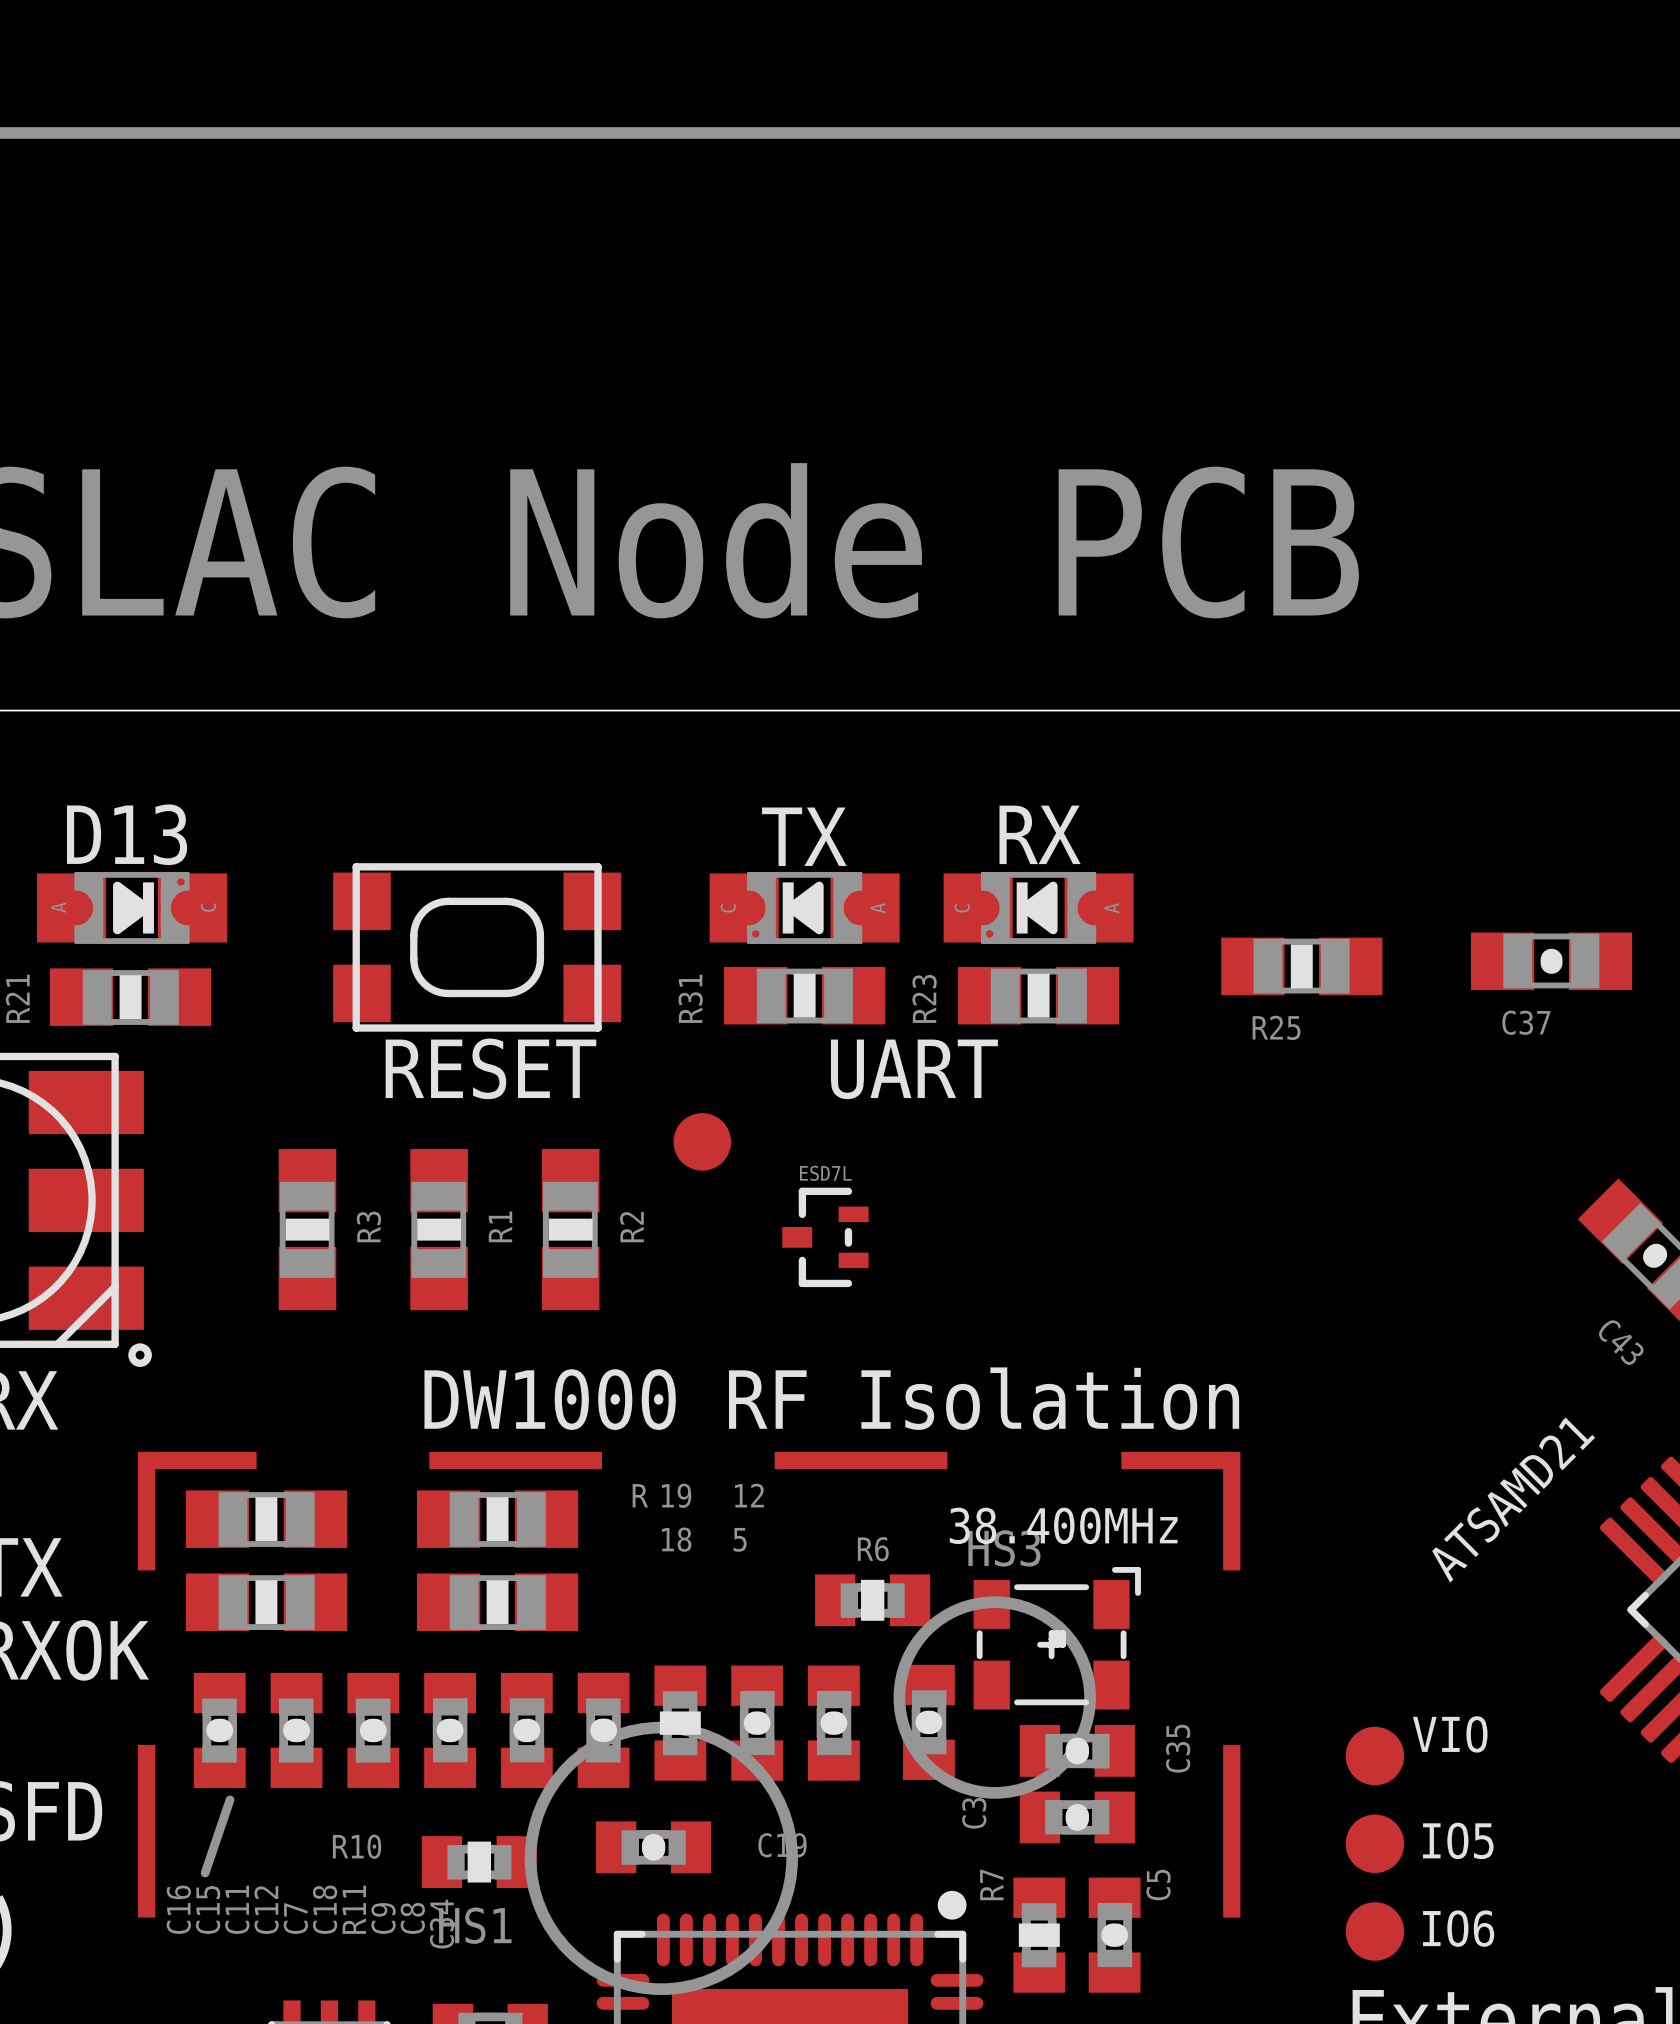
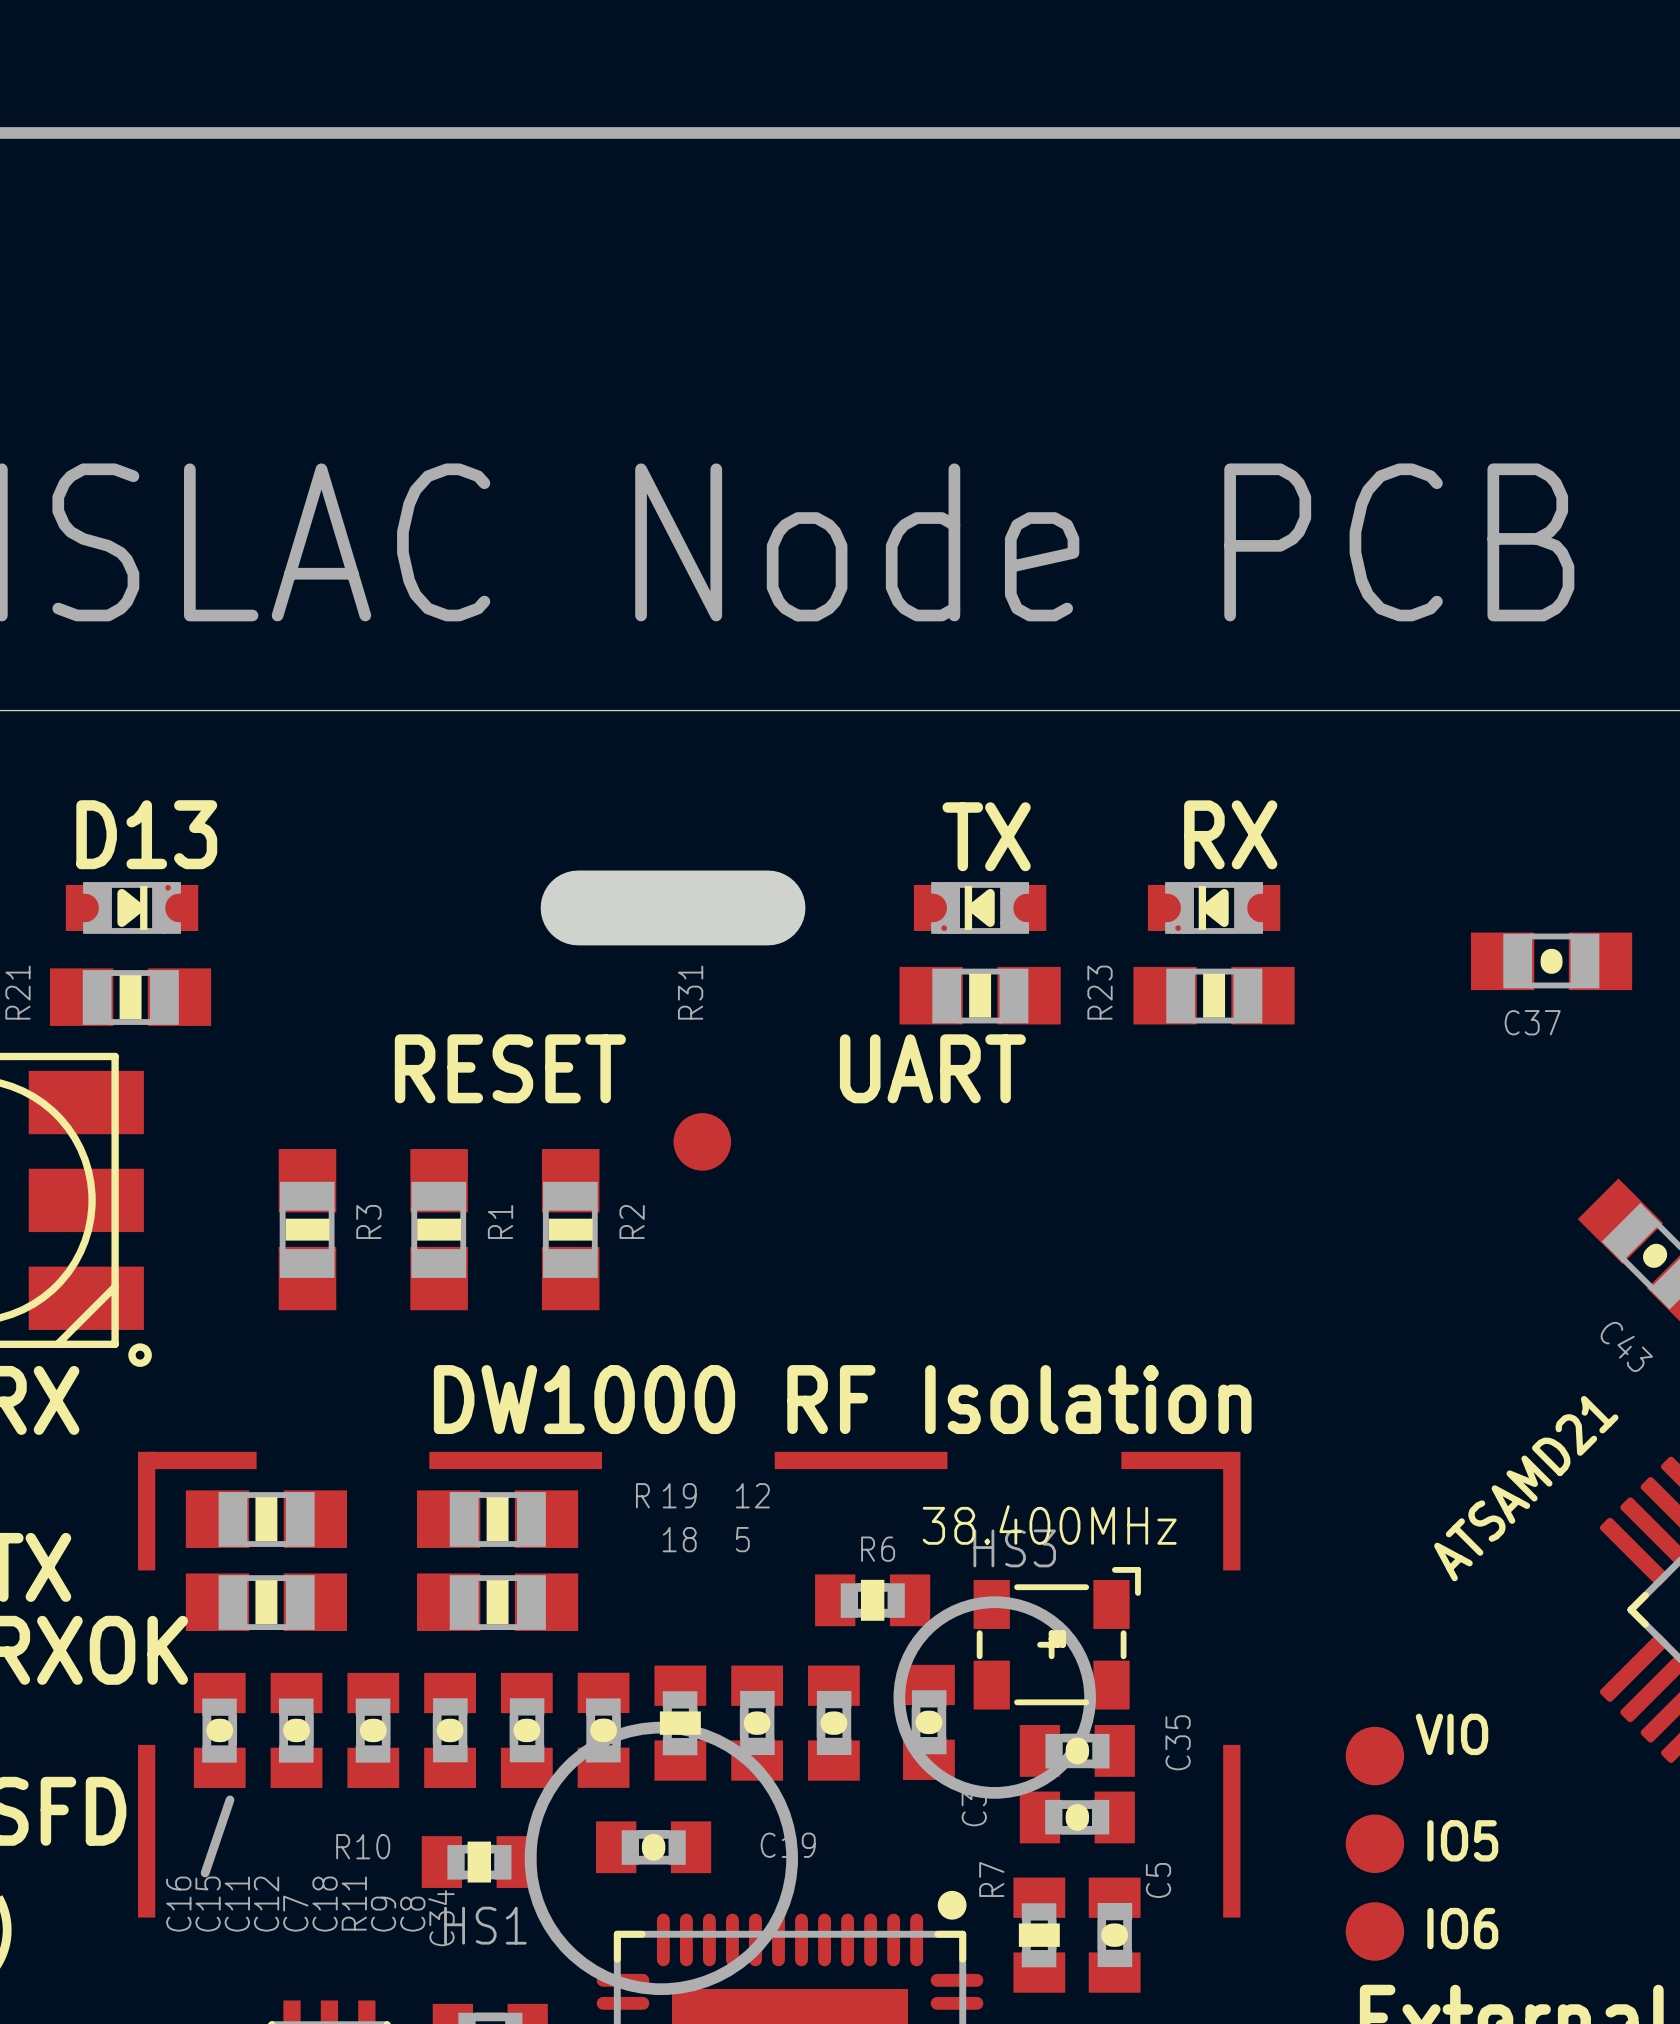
text position: RX (1040, 834) -> RX (1230, 834)
text position: TX (804, 836) -> TX (986, 836)
drawing: none -> [540, 870, 806, 946]
part footprint: [37, 871, 228, 944] -> [65, 882, 199, 934]
part: (804, 907) -> none
part: none -> (980, 907)
part: (1038, 907) -> none
part: none -> (1214, 907)
part: (477, 947) -> none
R25: (1301, 966) -> none
part: (804, 995) -> none
part position: (1038, 995) -> (980, 995)
part: none -> (1214, 995)
text position: R23 (924, 998) -> R23 (1100, 992)
part: ESD7L (825, 1237) -> none

